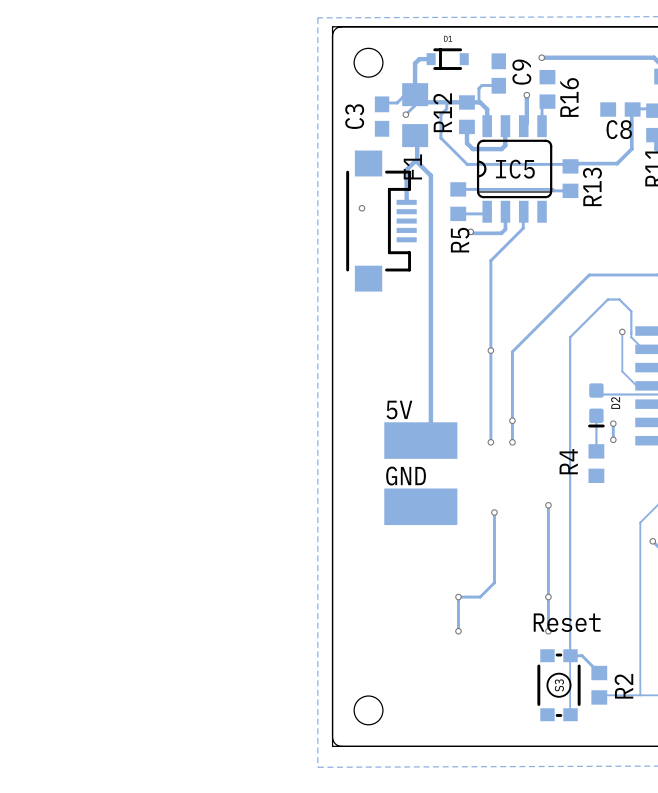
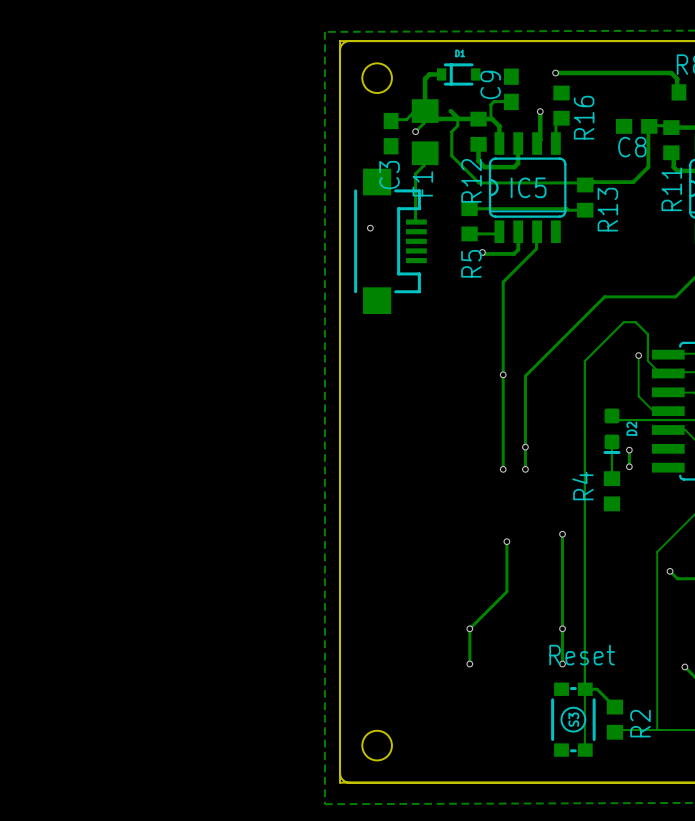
C9 name position: C9 (521, 72) -> C9 (490, 84)
track: none -> (450, 111) (458, 118)
R12 name position: R12 (442, 112) -> R12 (471, 180)
C3 name position: C3 (354, 116) -> C3 (389, 175)
track: (415, 135) (417, 137) (417, 162) (430, 175) (430, 430) -> none
track: (417, 159) (406, 169) (406, 202) -> (425, 153) (424, 164) (415, 173) (416, 222)
5V: (420, 440) -> none
GND: (420, 506) -> none
track: (494, 561) (494, 582) (480, 597) (458, 597) -> (506, 591) (469, 628)

